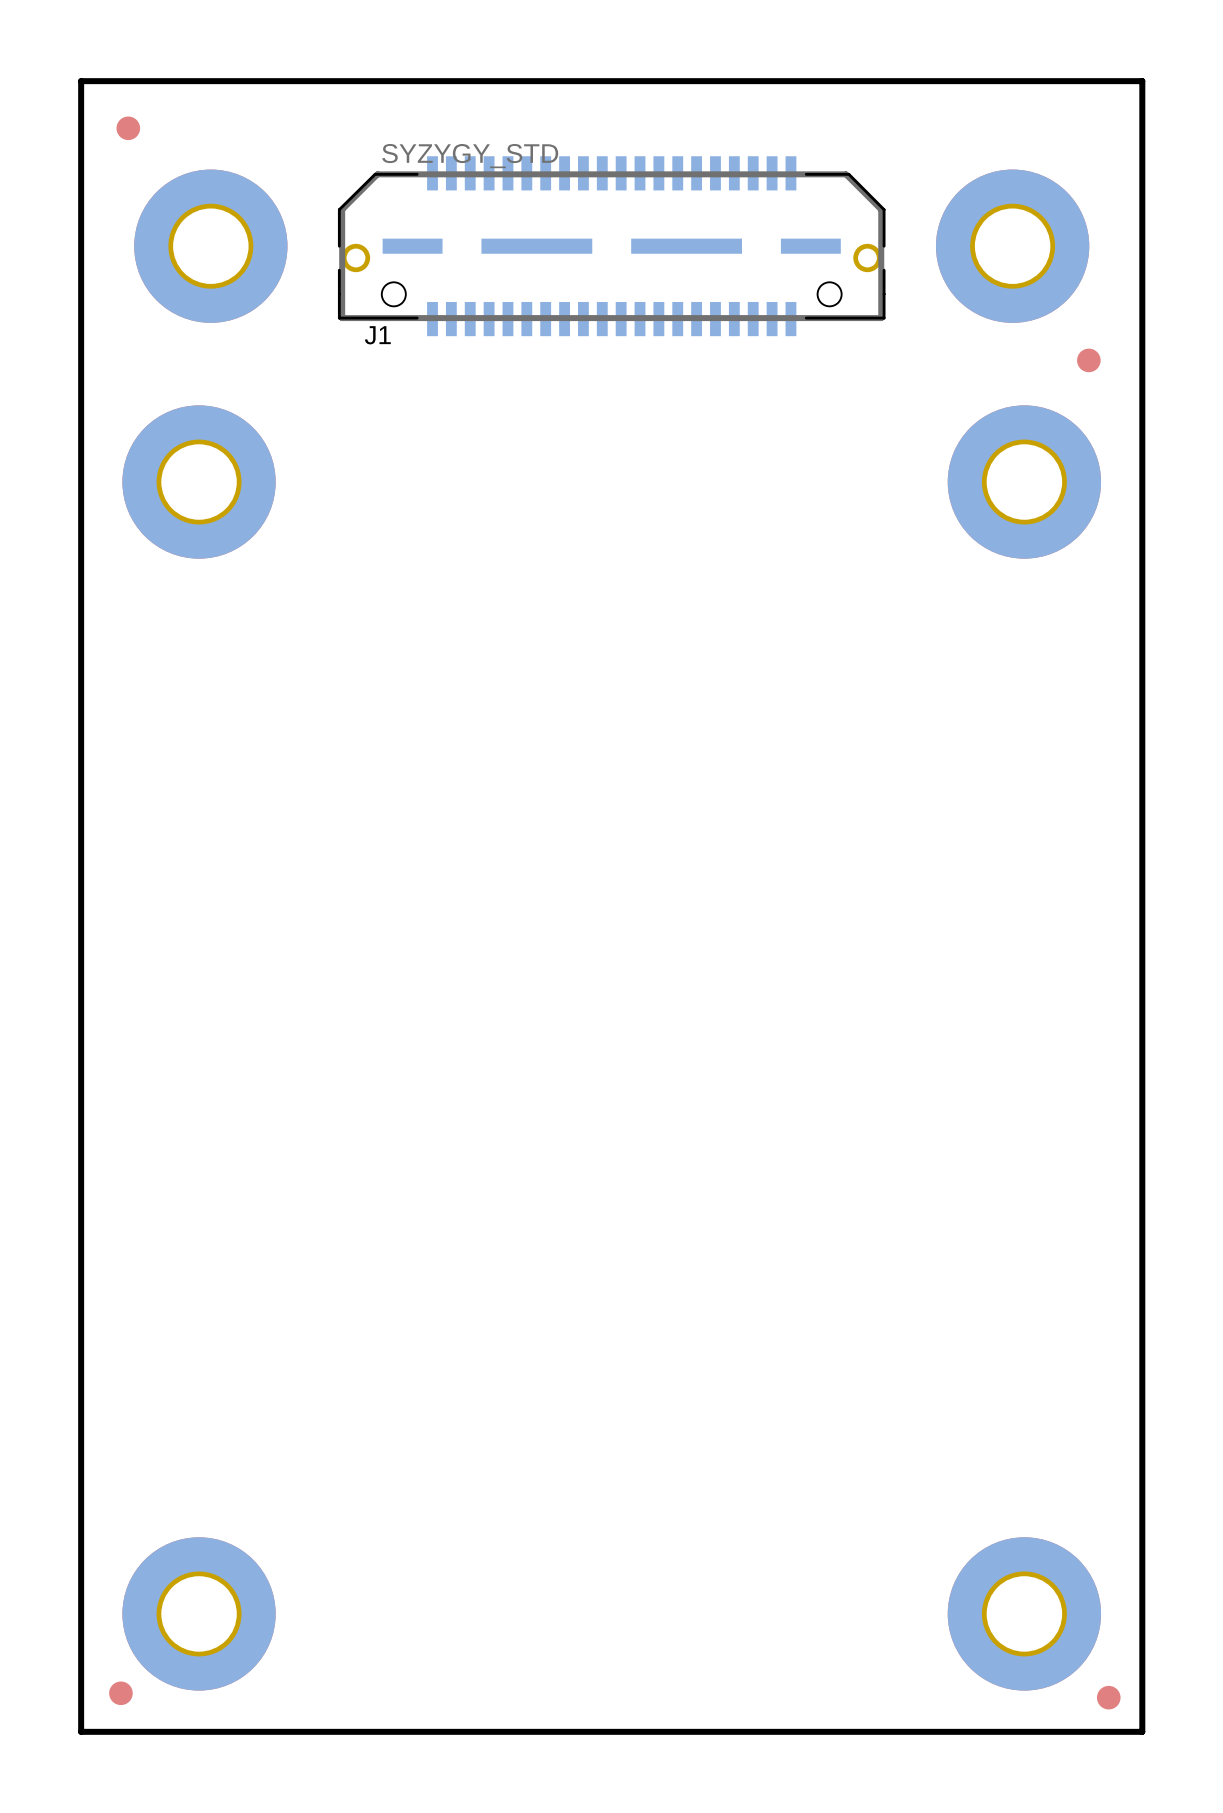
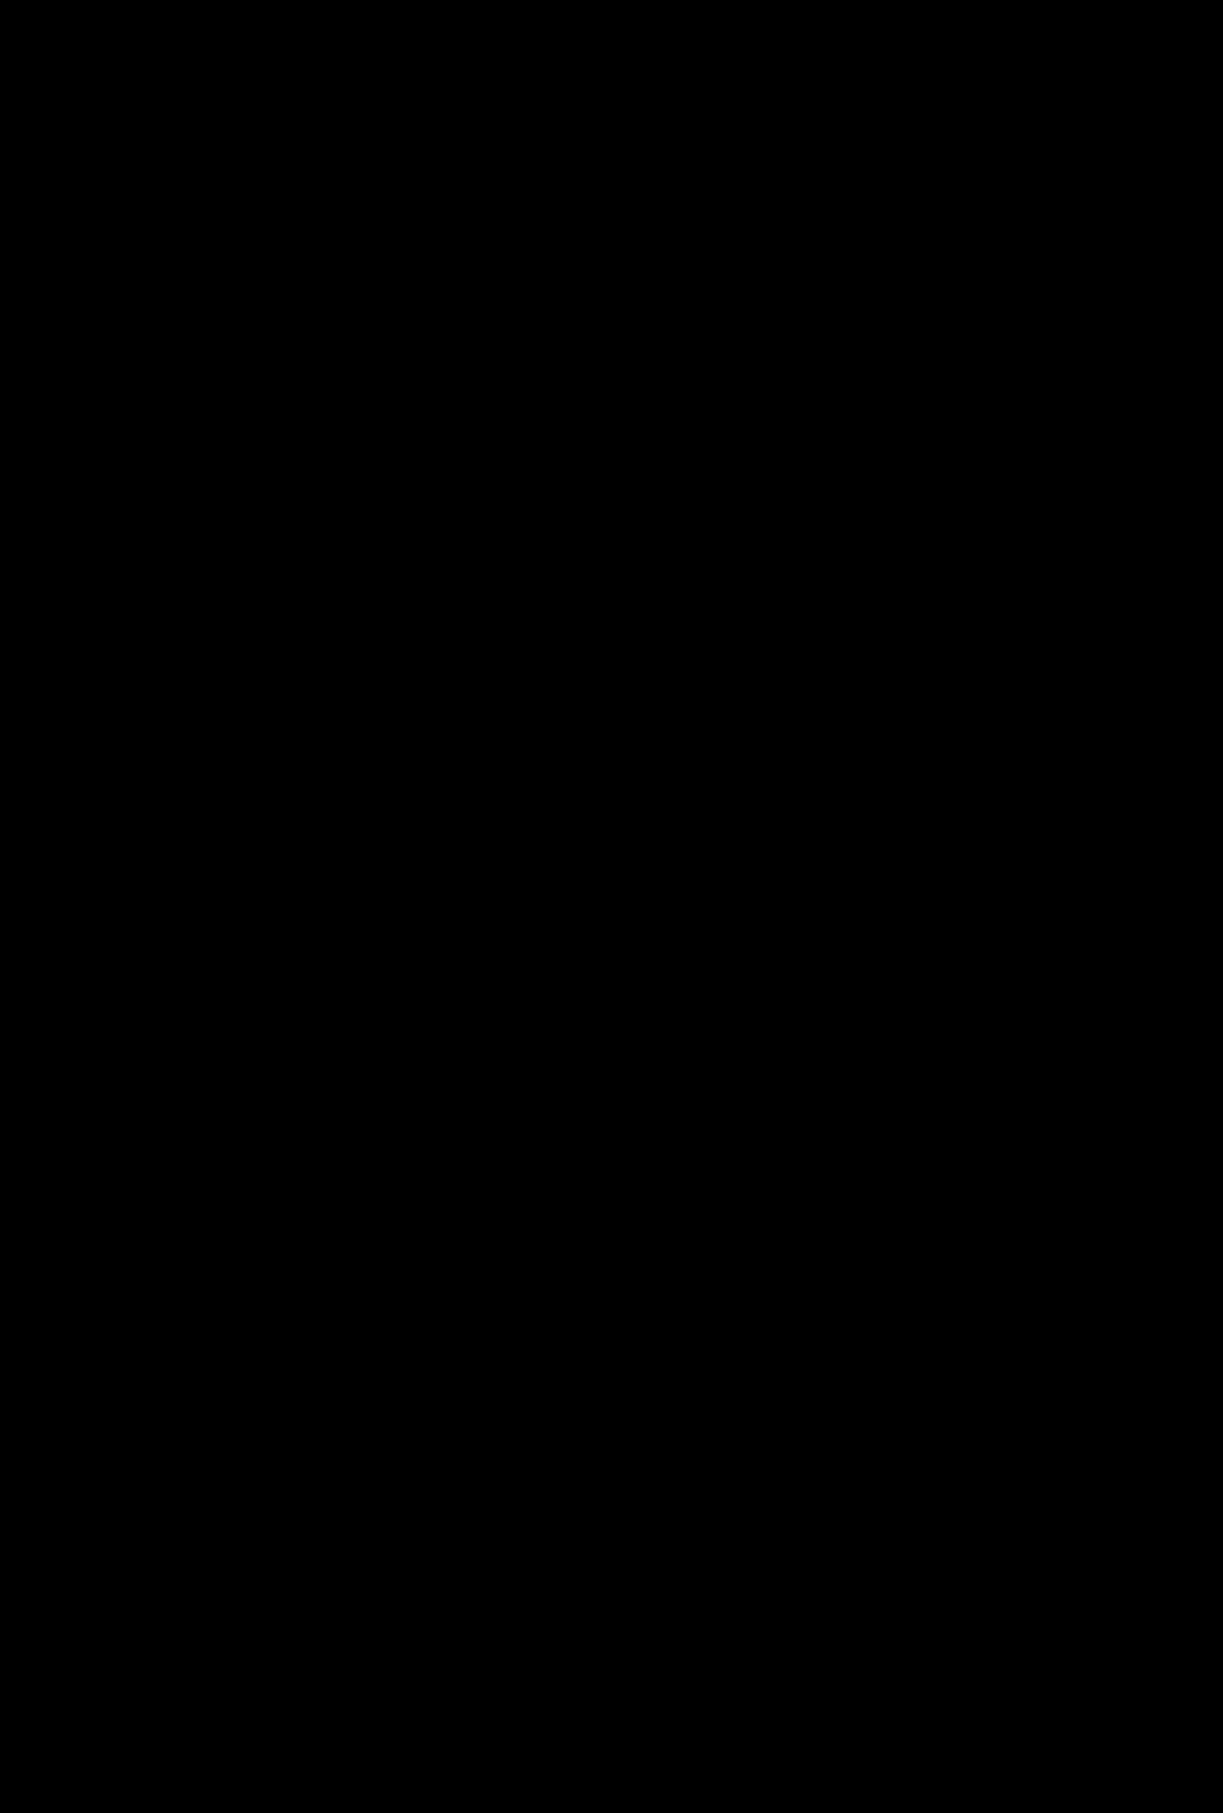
board edge: (1142, 81) (81, 81) (81, 1731) (1142, 1731) (1142, 81) -> none
part: (128, 128) -> none
part: (210, 246) -> none
J1: SYZYGY_STD (611, 246) -> none
part: (1012, 246) -> none
part: (1088, 360) -> none
part: (199, 482) -> none
part: (1024, 482) -> none
part: (199, 1613) -> none
part: (1024, 1613) -> none
part: (120, 1693) -> none
part: (1108, 1697) -> none

